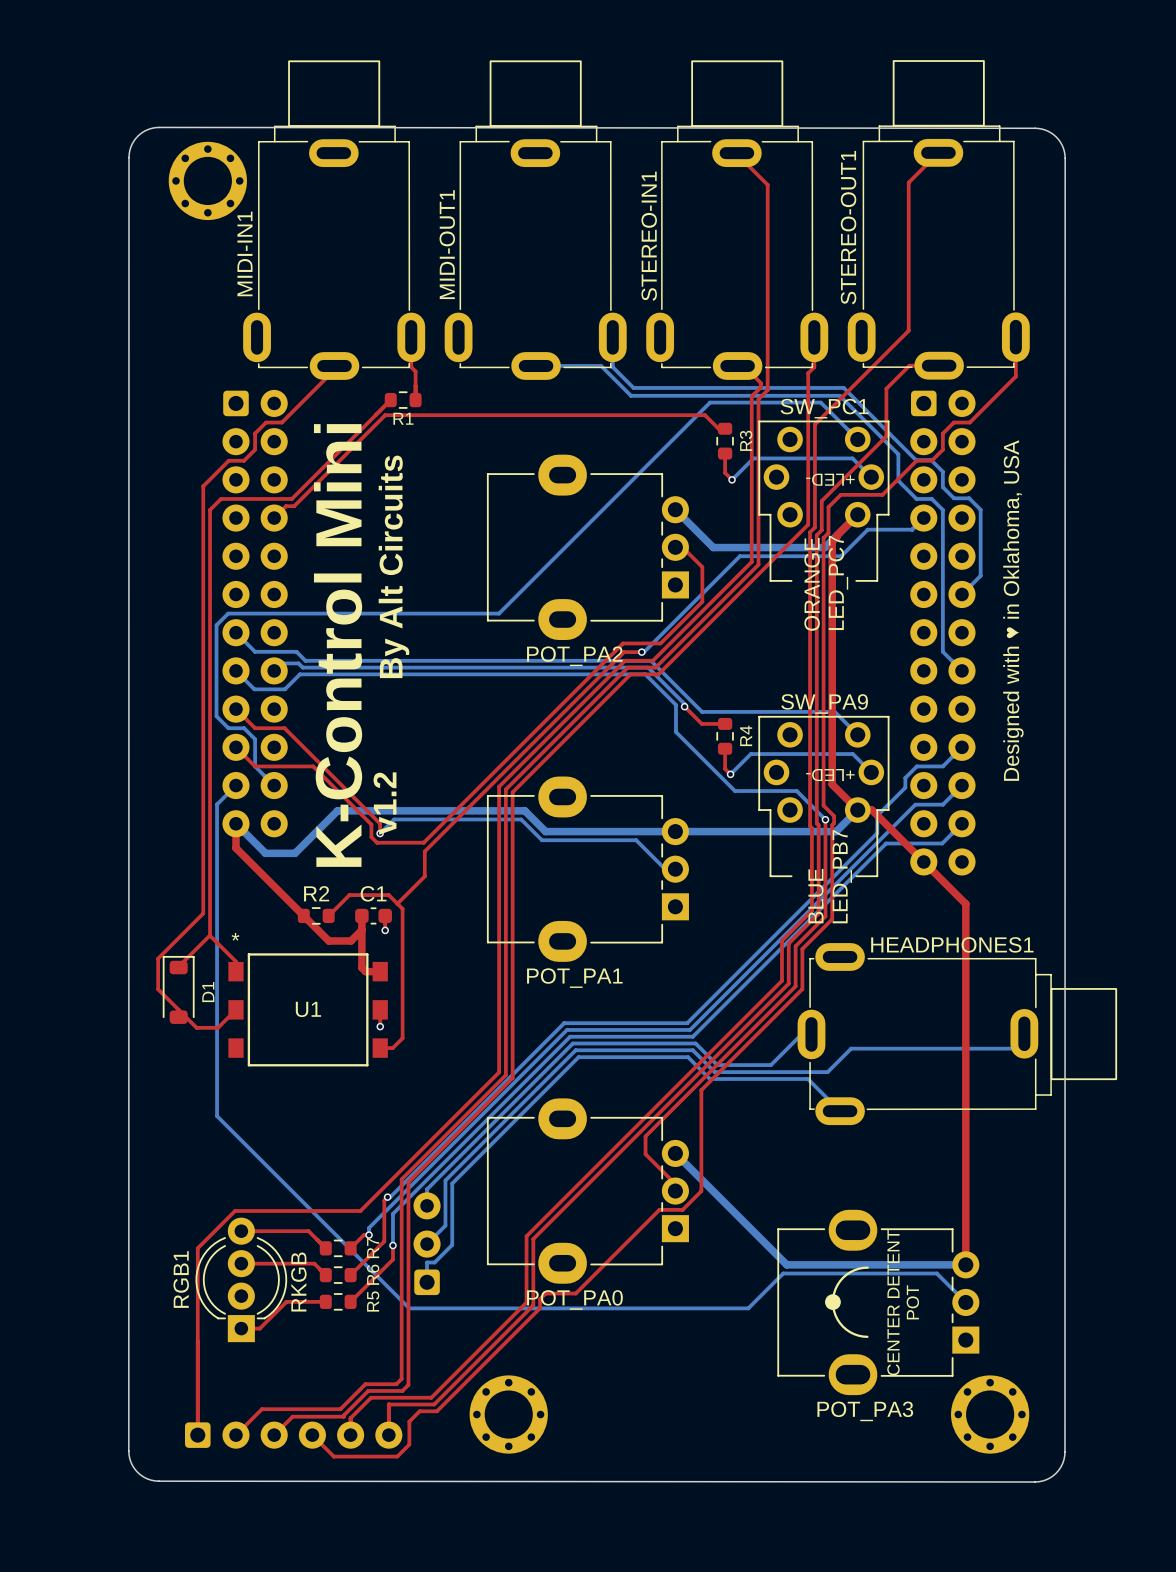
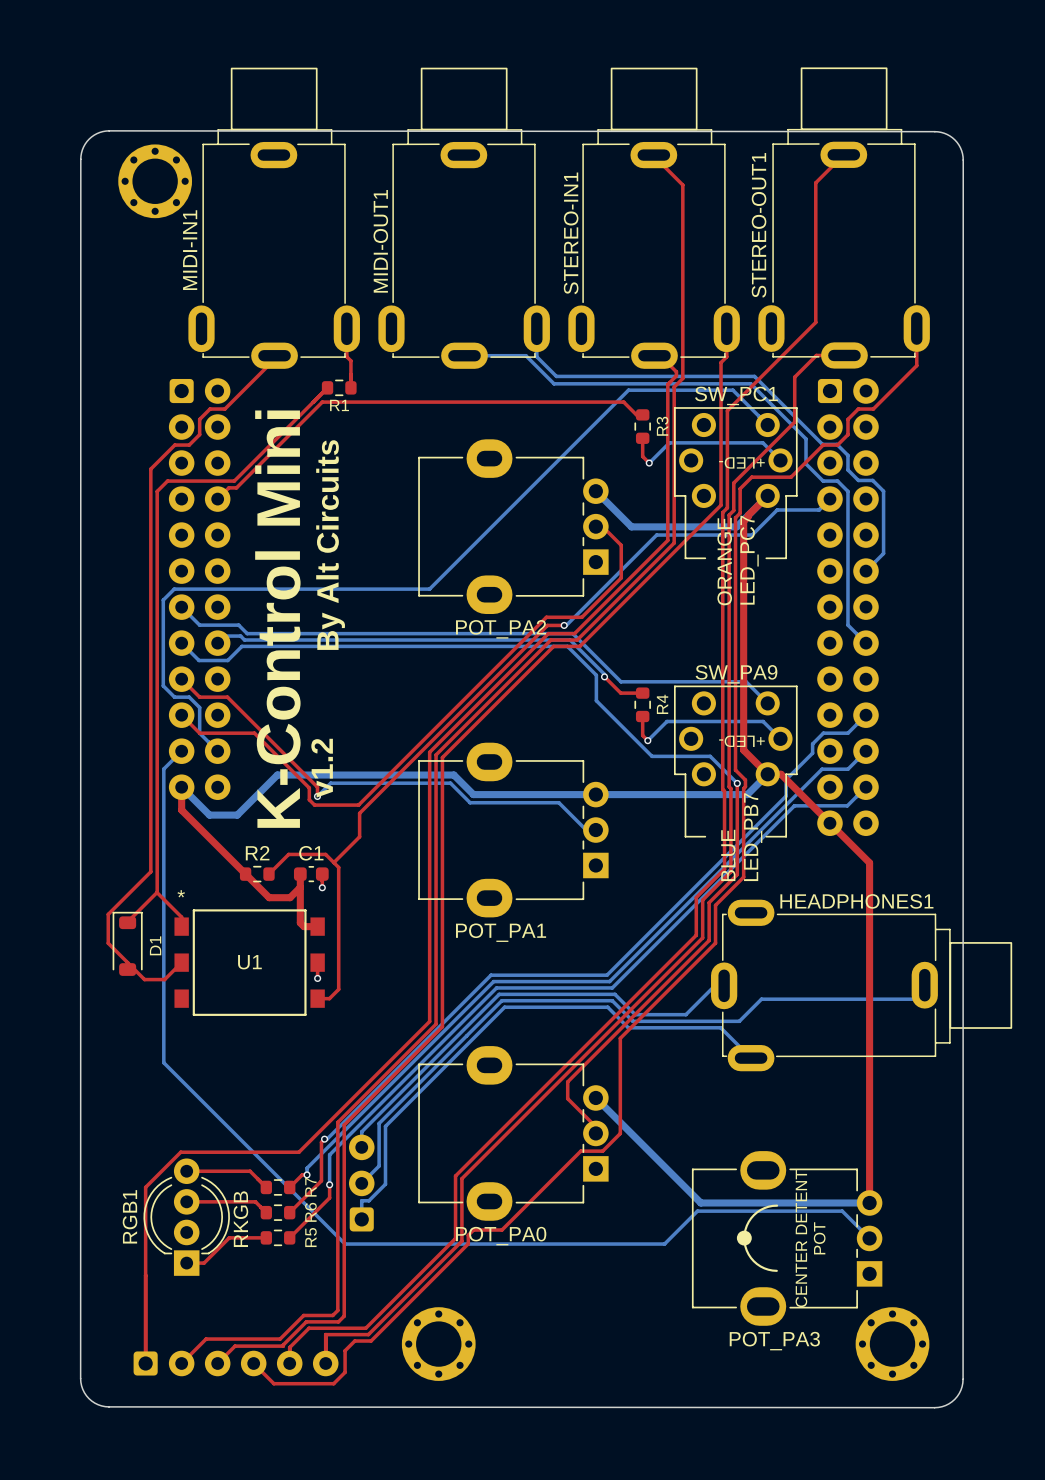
text: Designed with ♥ in Oklahoma, USA (1013, 610) -> none

